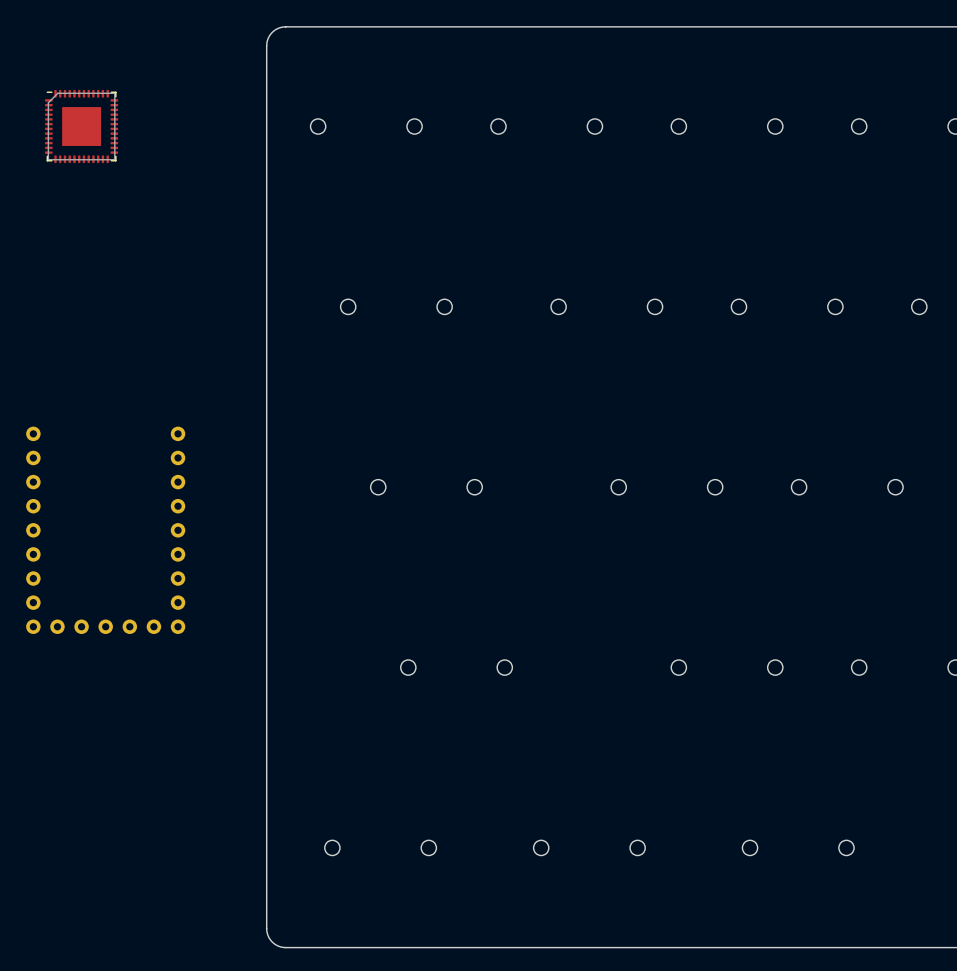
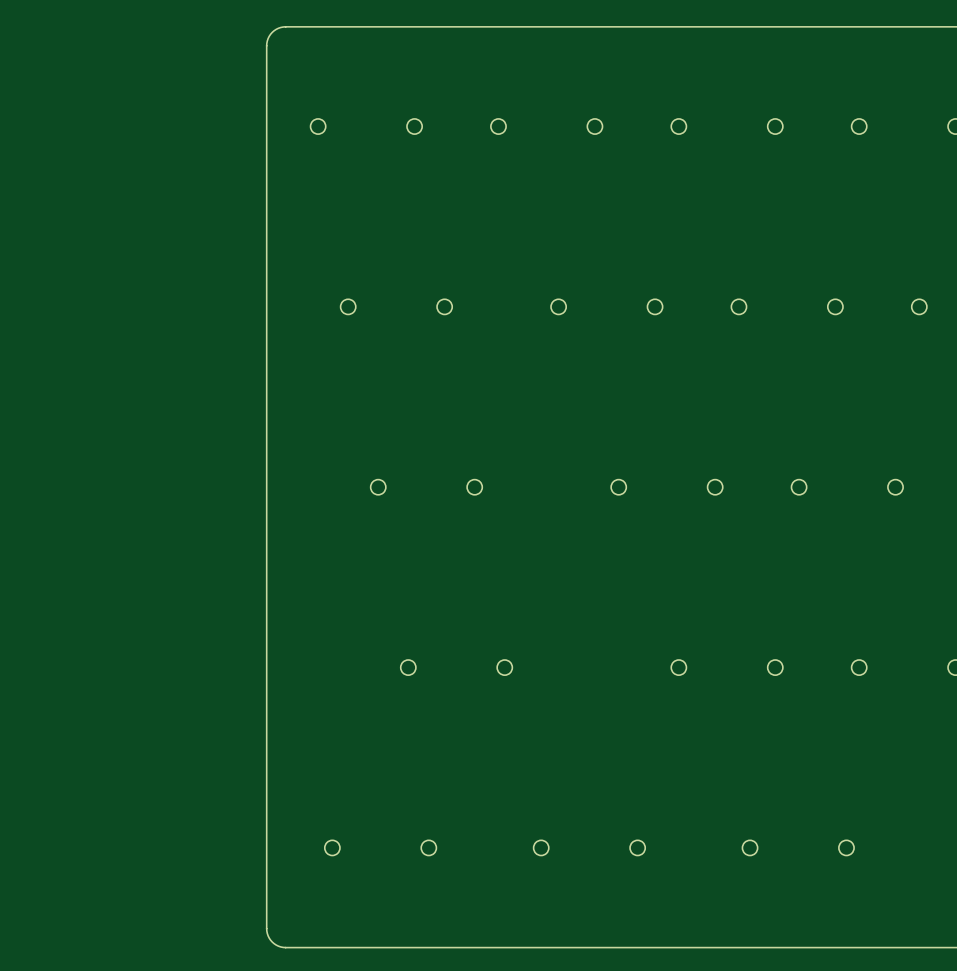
part: (81, 126) -> none
part: (105, 530) -> none

